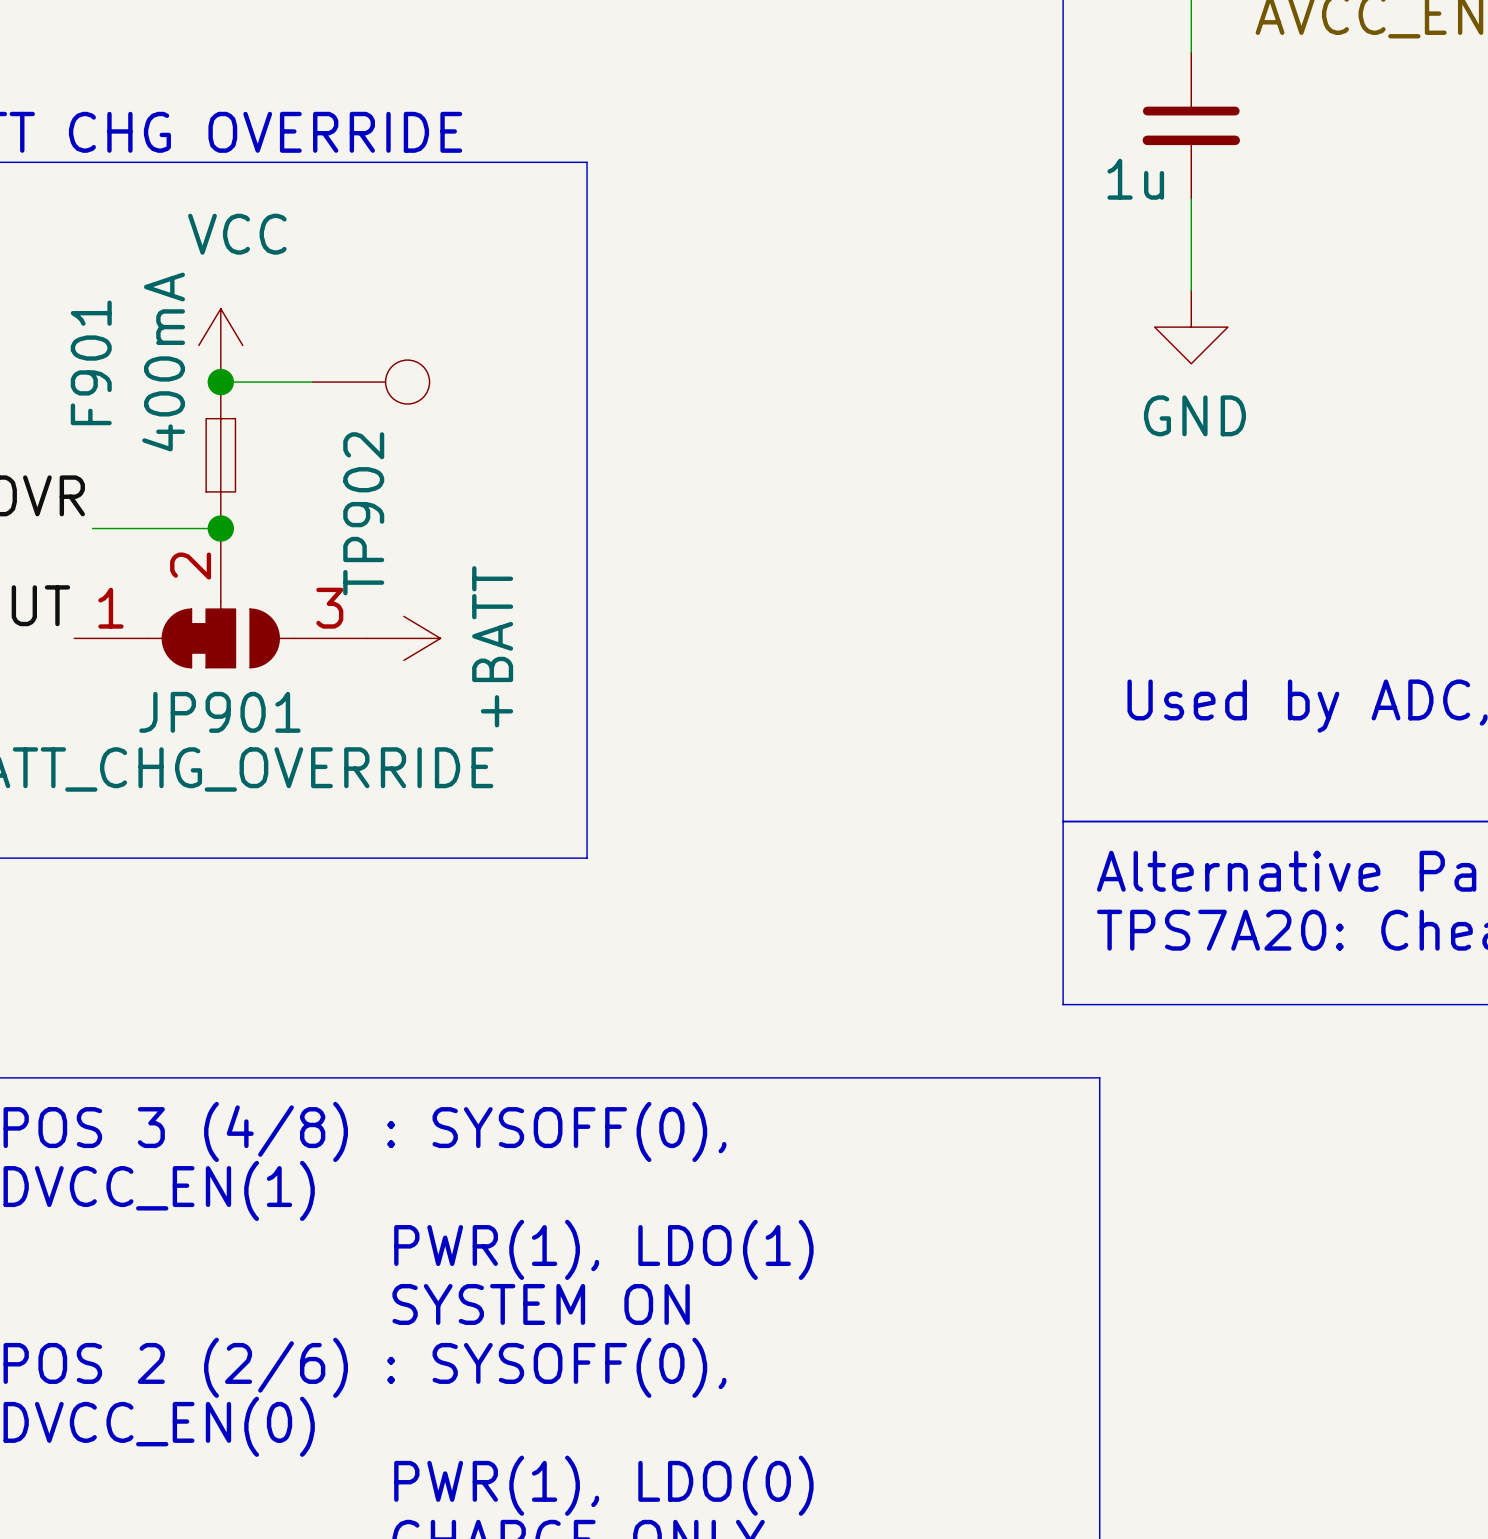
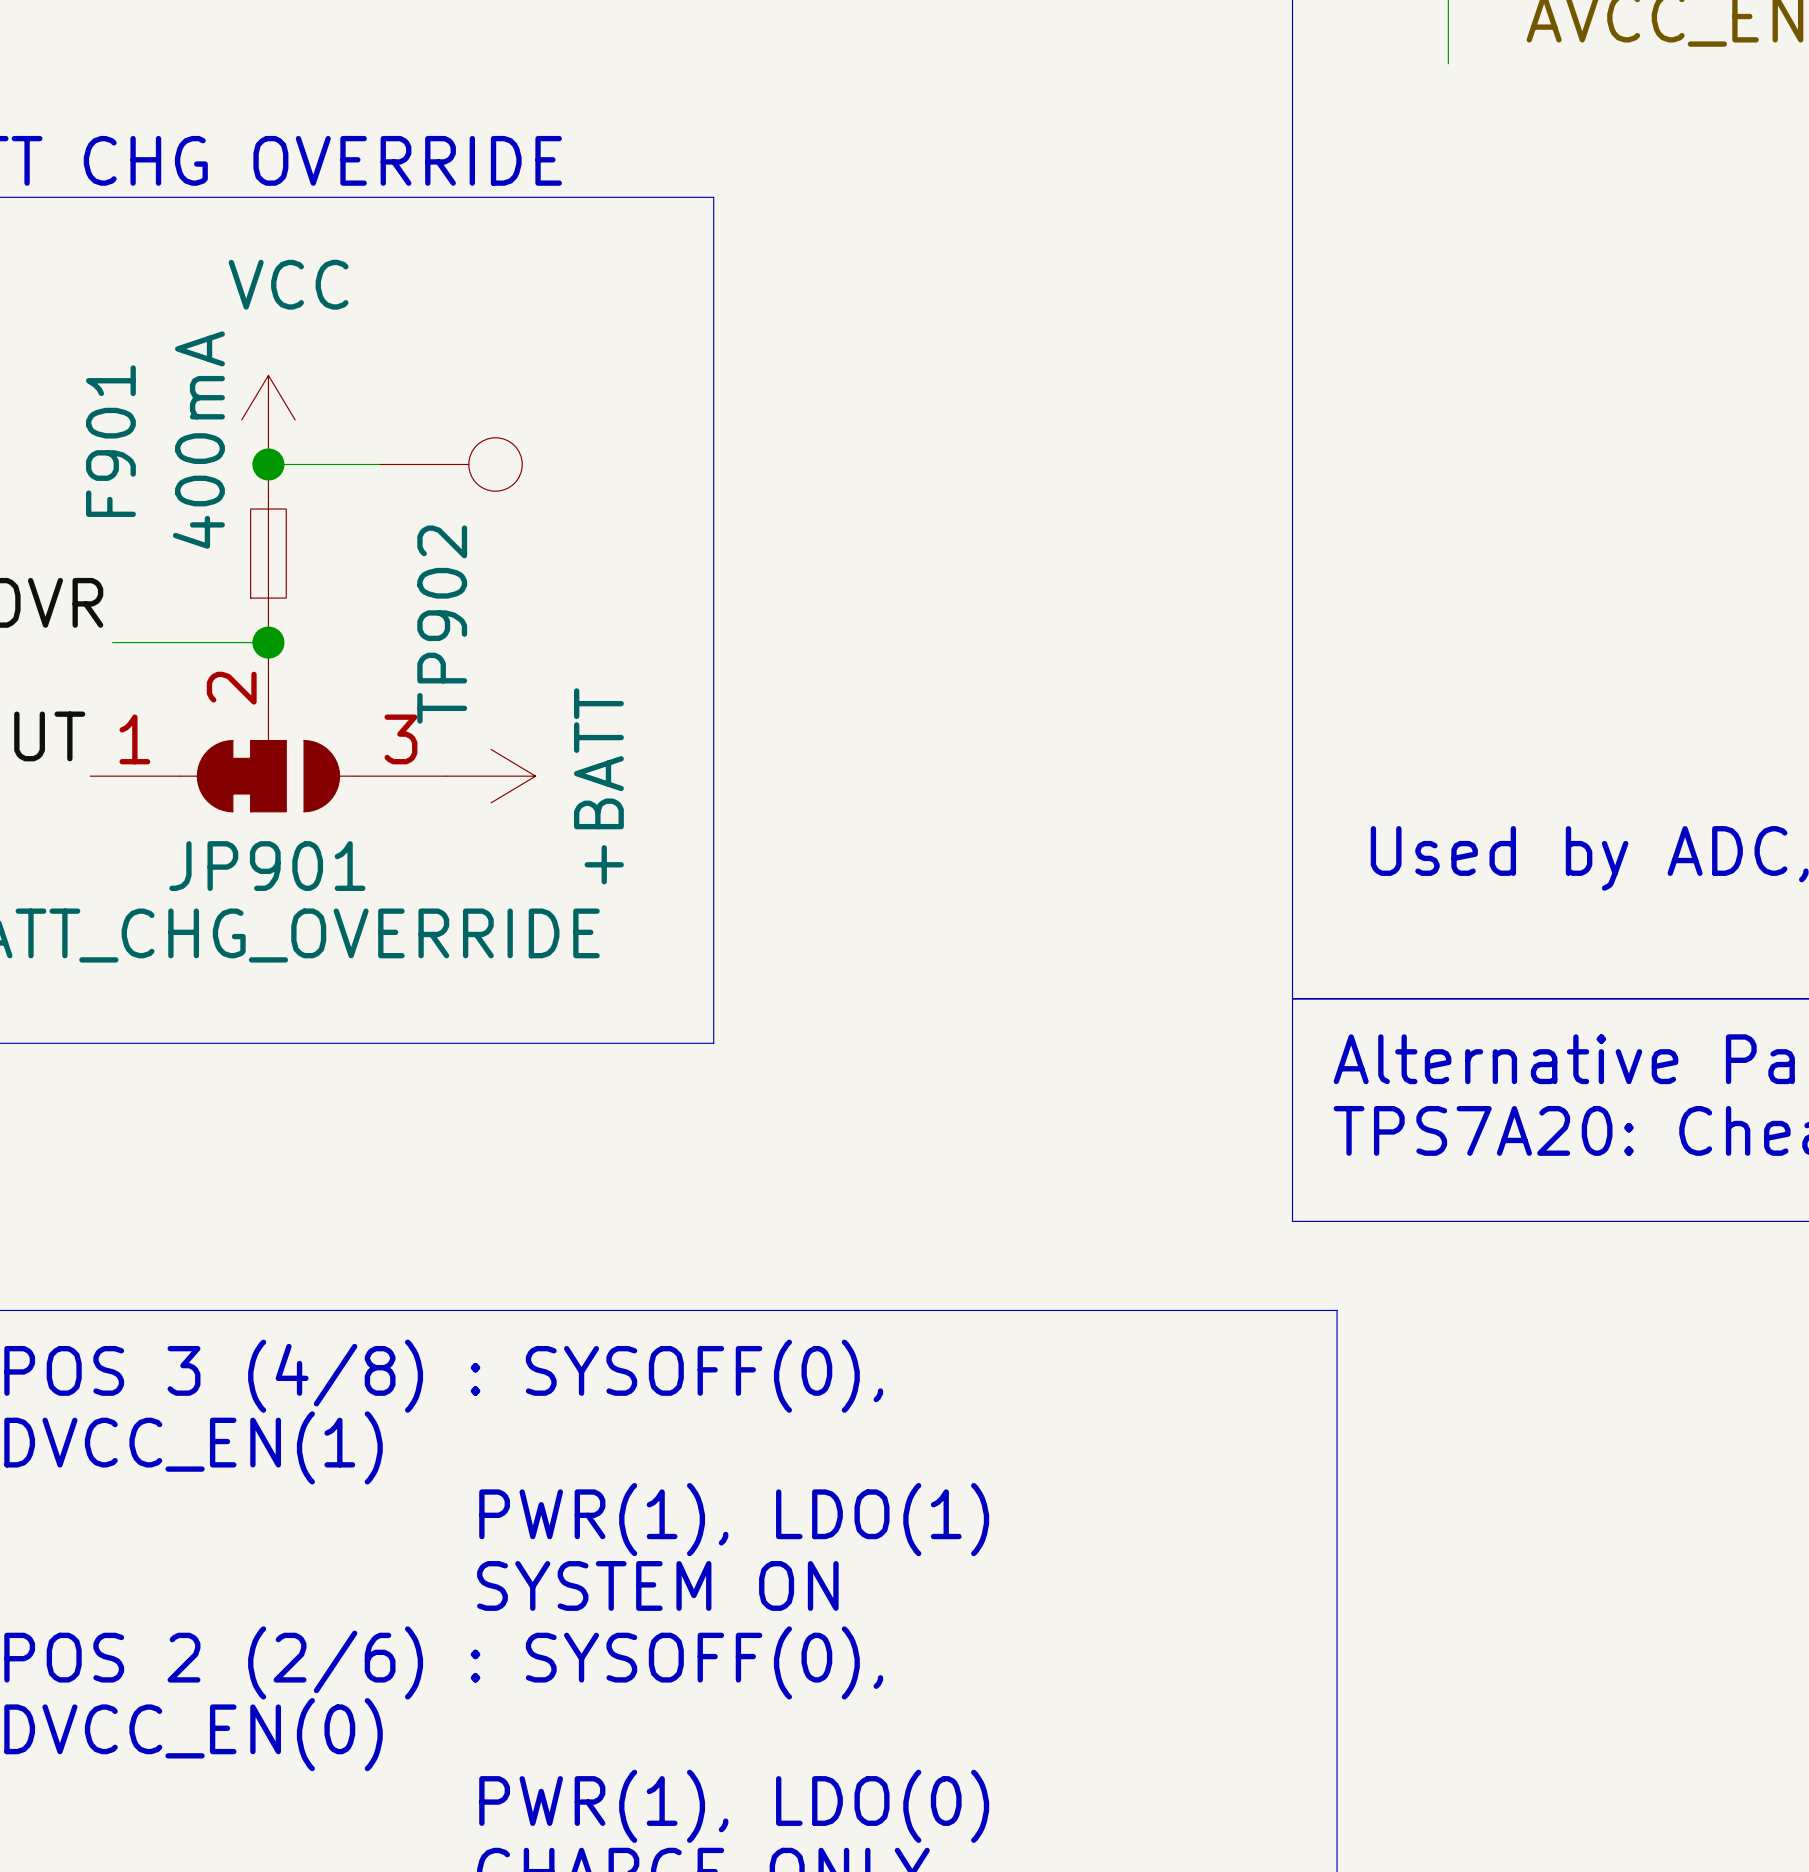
part: 1u (1191, 125) -> none
wire: (1191, 198) (1191, 290) -> none
power symbol: GND (1191, 327) -> none

